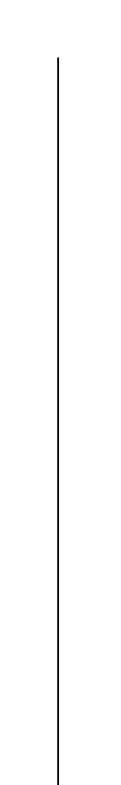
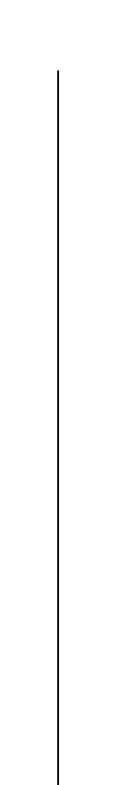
line: (58, 58) (58, 71) -> none

